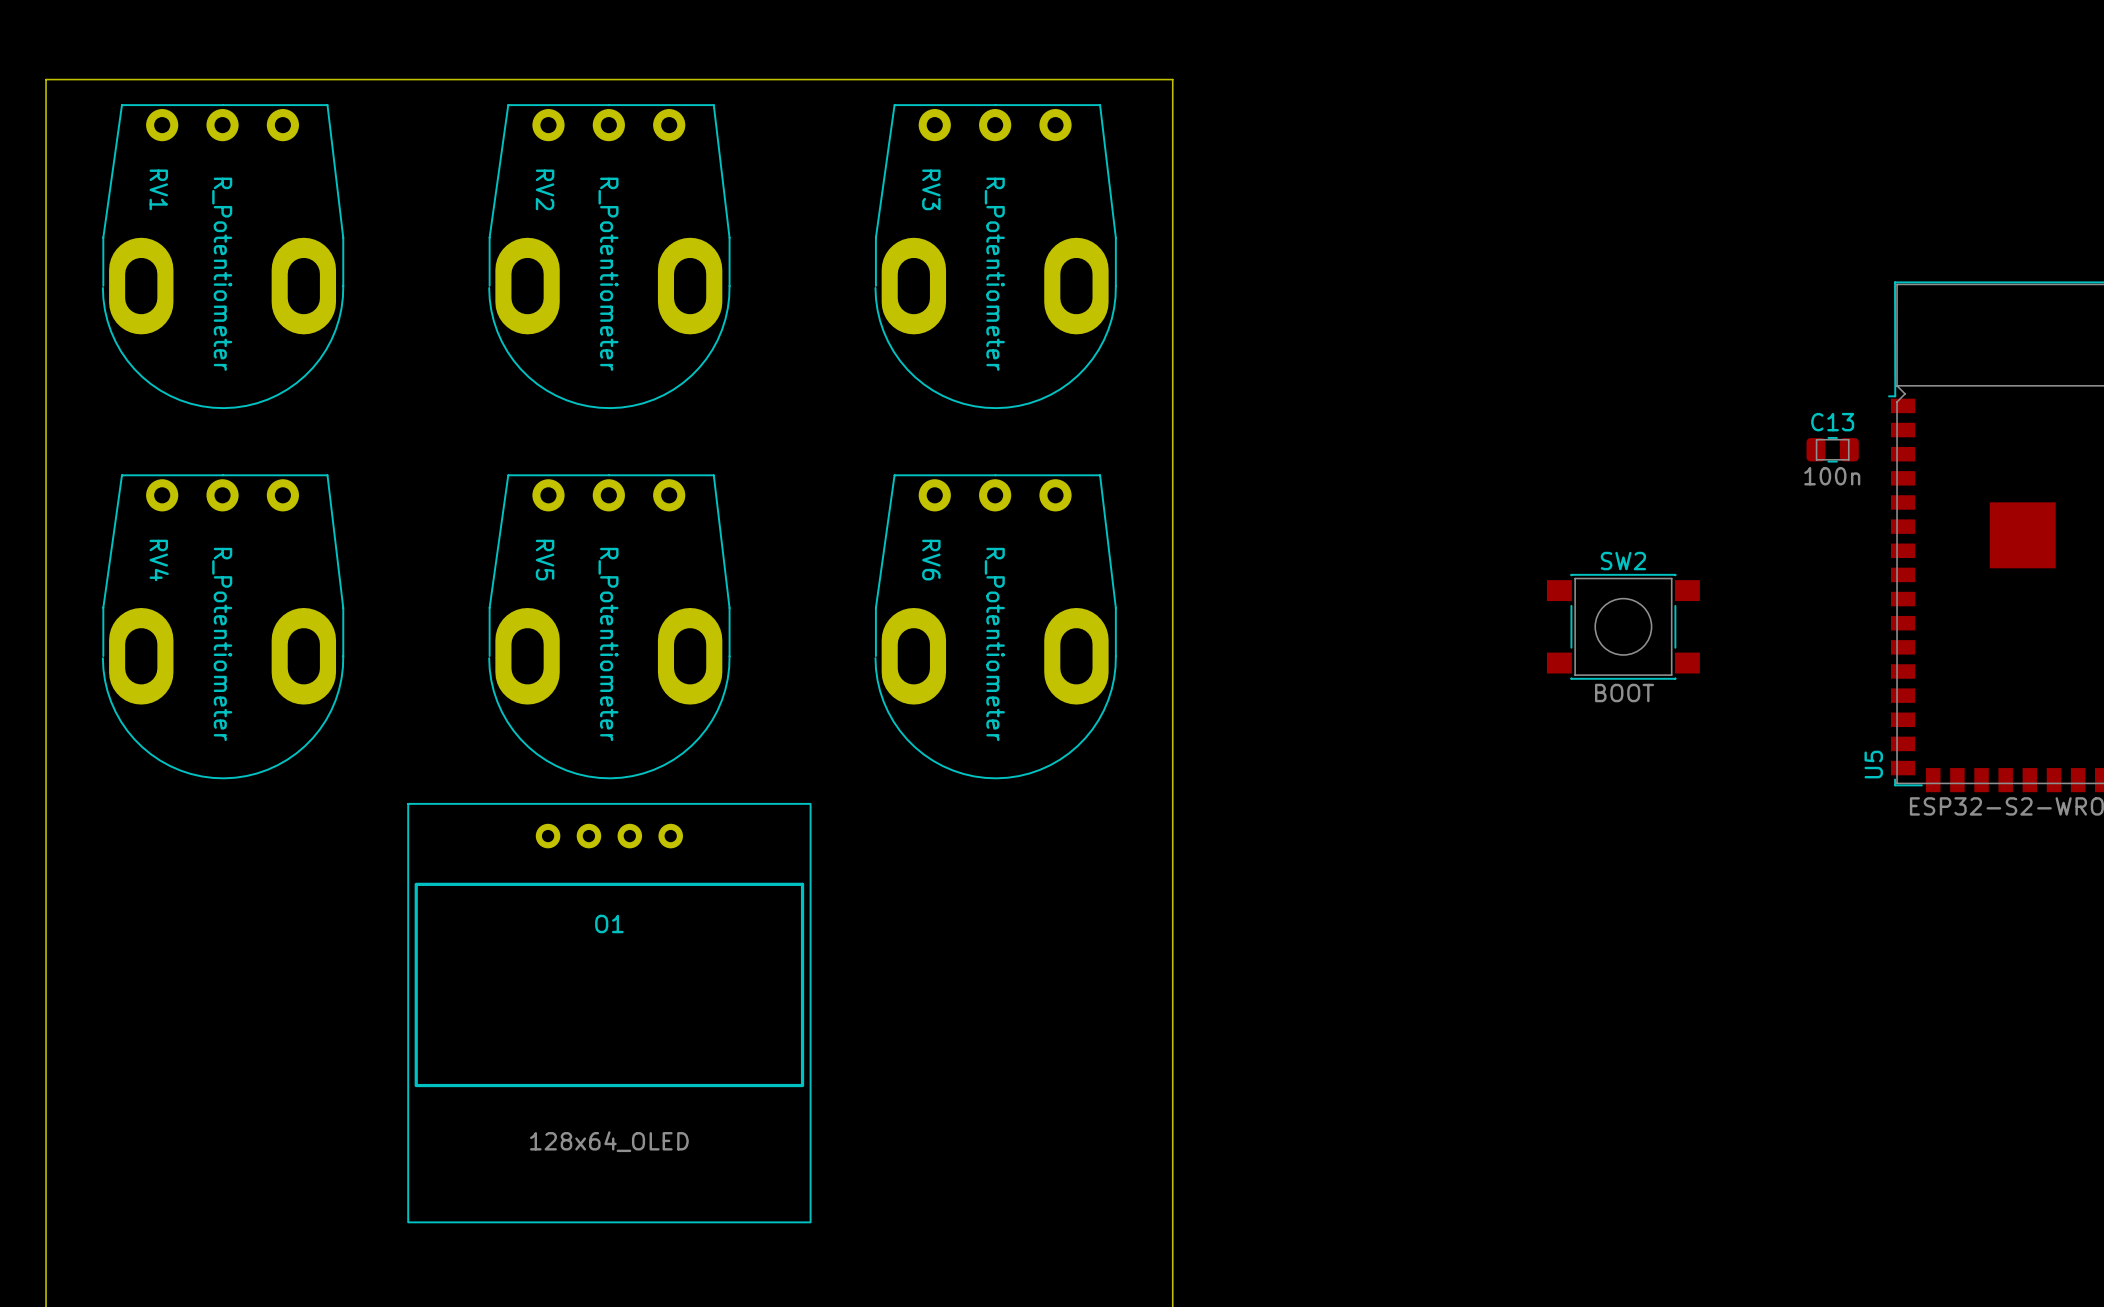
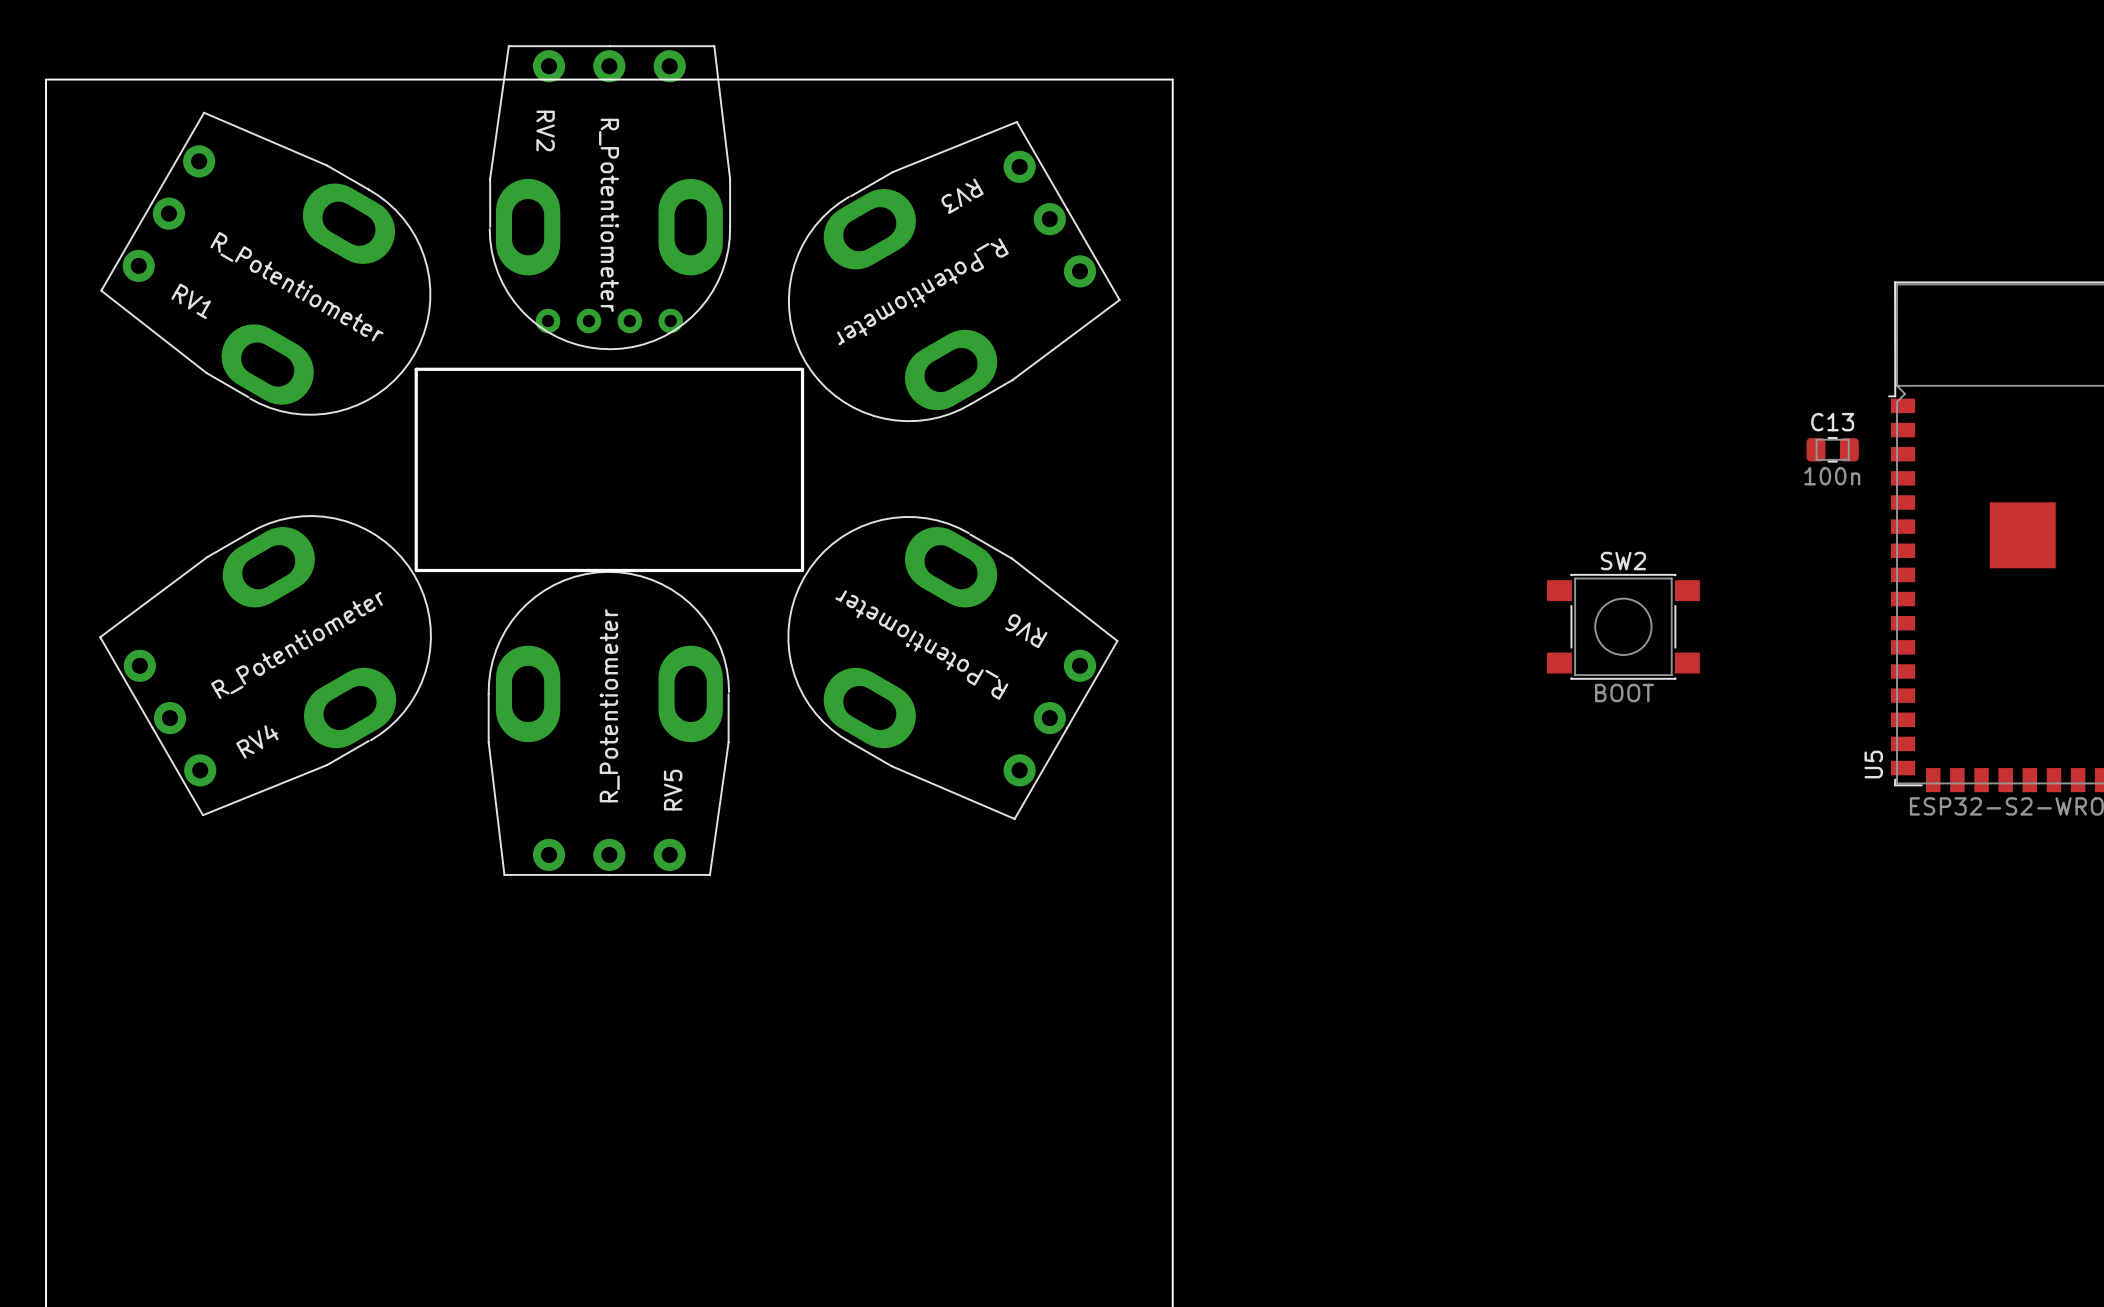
RV1 footprint: [101, 104, 345, 410] -> [100, 111, 432, 416]
RV3 footprint: [874, 104, 1117, 410] -> [787, 121, 1121, 423]
RV1 name position: RV1 (158, 189) -> RV1 (191, 301)
RV3 name position: RV3 (931, 189) -> RV3 (962, 196)
RV2 position: (609, 256) -> (609, 197)
RV1 value position: R_Potentiometer (222, 274) -> R_Potentiometer (296, 286)
RV3 value position: R_Potentiometer (994, 274) -> R_Potentiometer (922, 291)
part: none -> (609, 440)
RV6 footprint: [874, 474, 1117, 780] -> [787, 516, 1119, 820]
RV6 name position: RV6 (931, 560) -> RV6 (1026, 631)
RV4 rotation: 0° (223, 626) -> 120° counterclockwise (265, 665)
RV5 rotation: 0° (609, 626) -> 180° (608, 723)
RV6 value position: R_Potentiometer (994, 644) -> R_Potentiometer (921, 645)
O1: 128x64_OLED (609, 1013) -> none

